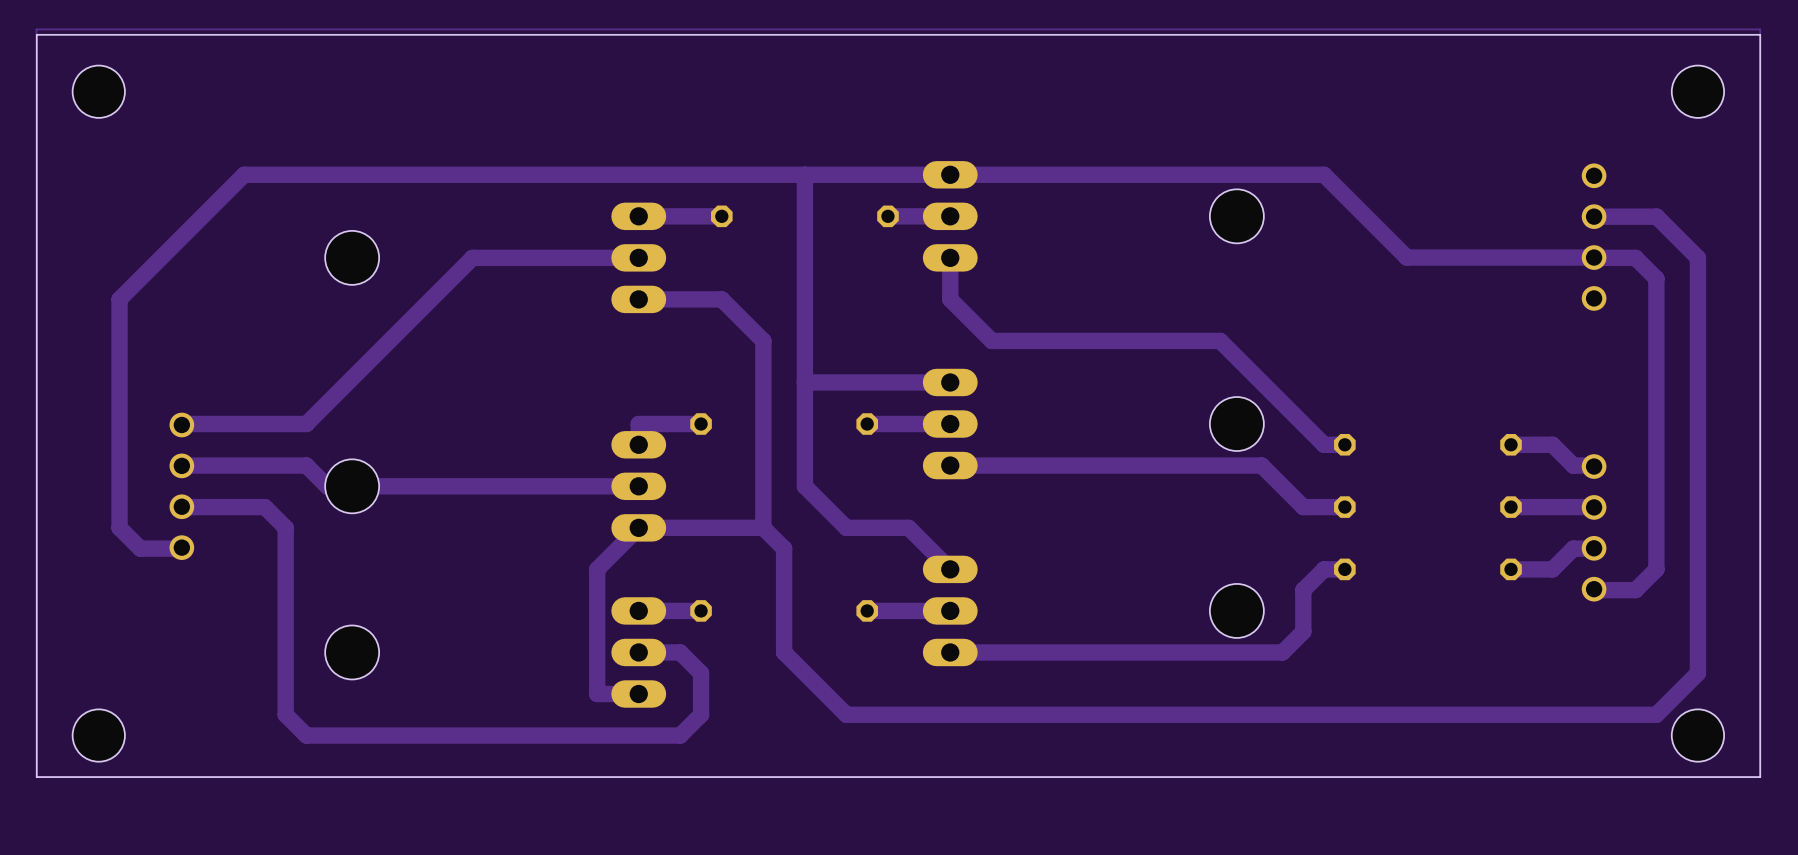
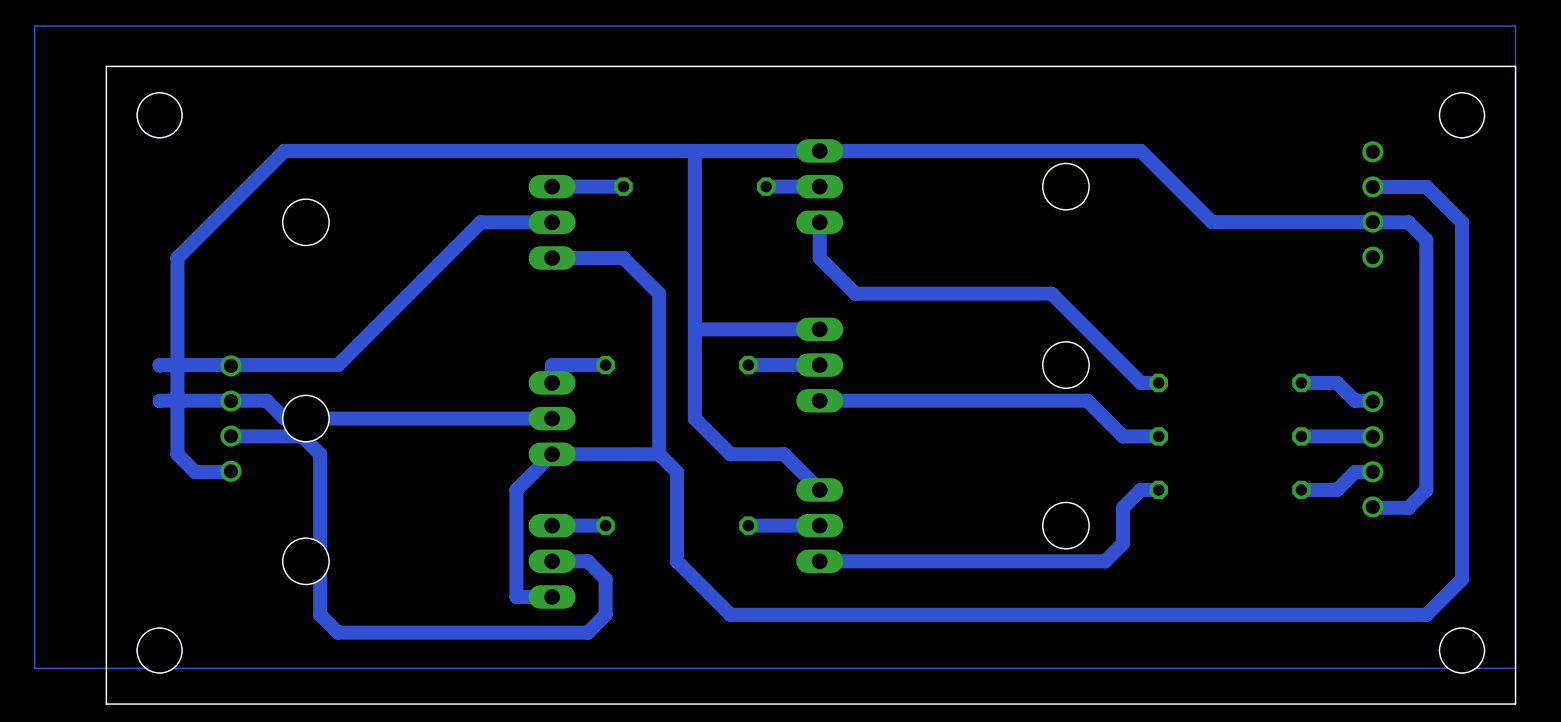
board edge: (1760, 76) (1760, 34) (36, 34) (36, 777) (1760, 777) -> (1515, 66) (106, 66) (106, 704) (1515, 704) (1515, 668)
hole position: (98, 91) -> (159, 115)
hole position: (1697, 91) -> (1462, 115)
track: (327, 174) (244, 174) (119, 299) (119, 527) (140, 548) (181, 547) -> (284, 150) (177, 258) (177, 454) (195, 472) (230, 471)
track: (555, 257) (472, 257) (306, 424) -> (480, 222) (338, 365) (266, 365)
part position: (181, 486) -> (230, 418)
track: (181, 506) (264, 507) (285, 527) (285, 714) (306, 735) (389, 735) -> (230, 436) (302, 436) (320, 454) (320, 614) (338, 632)
hole position: (98, 735) -> (159, 650)
hole position: (1697, 735) -> (1462, 650)

